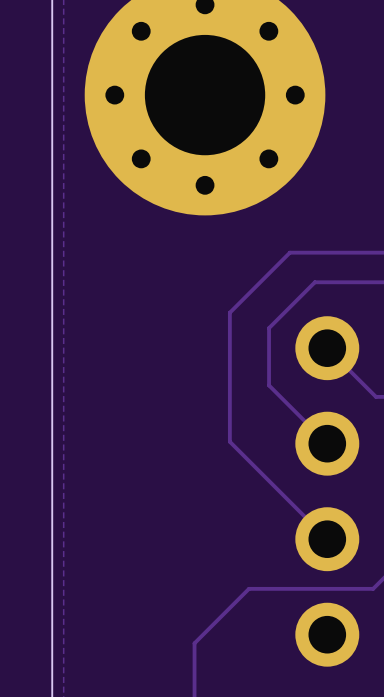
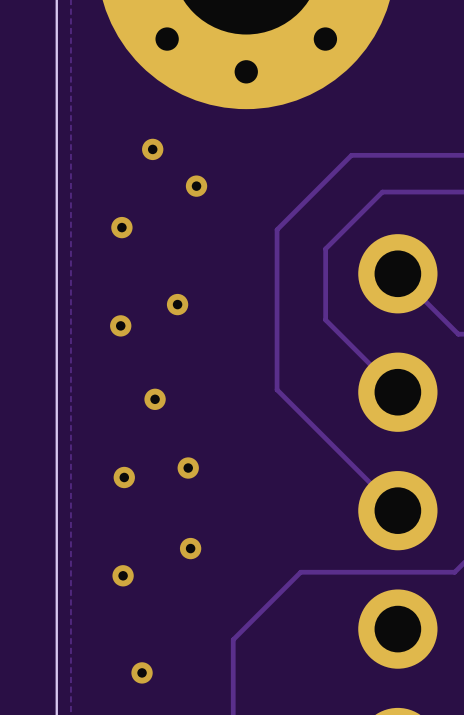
via: none -> (152, 149)
via: none -> (196, 186)
via: none -> (121, 227)
via: none -> (177, 304)
via: none -> (120, 325)
via: none -> (155, 399)
via: none -> (188, 468)
via: none -> (124, 477)
via: none -> (190, 548)
via: none -> (123, 575)
via: none -> (142, 672)

